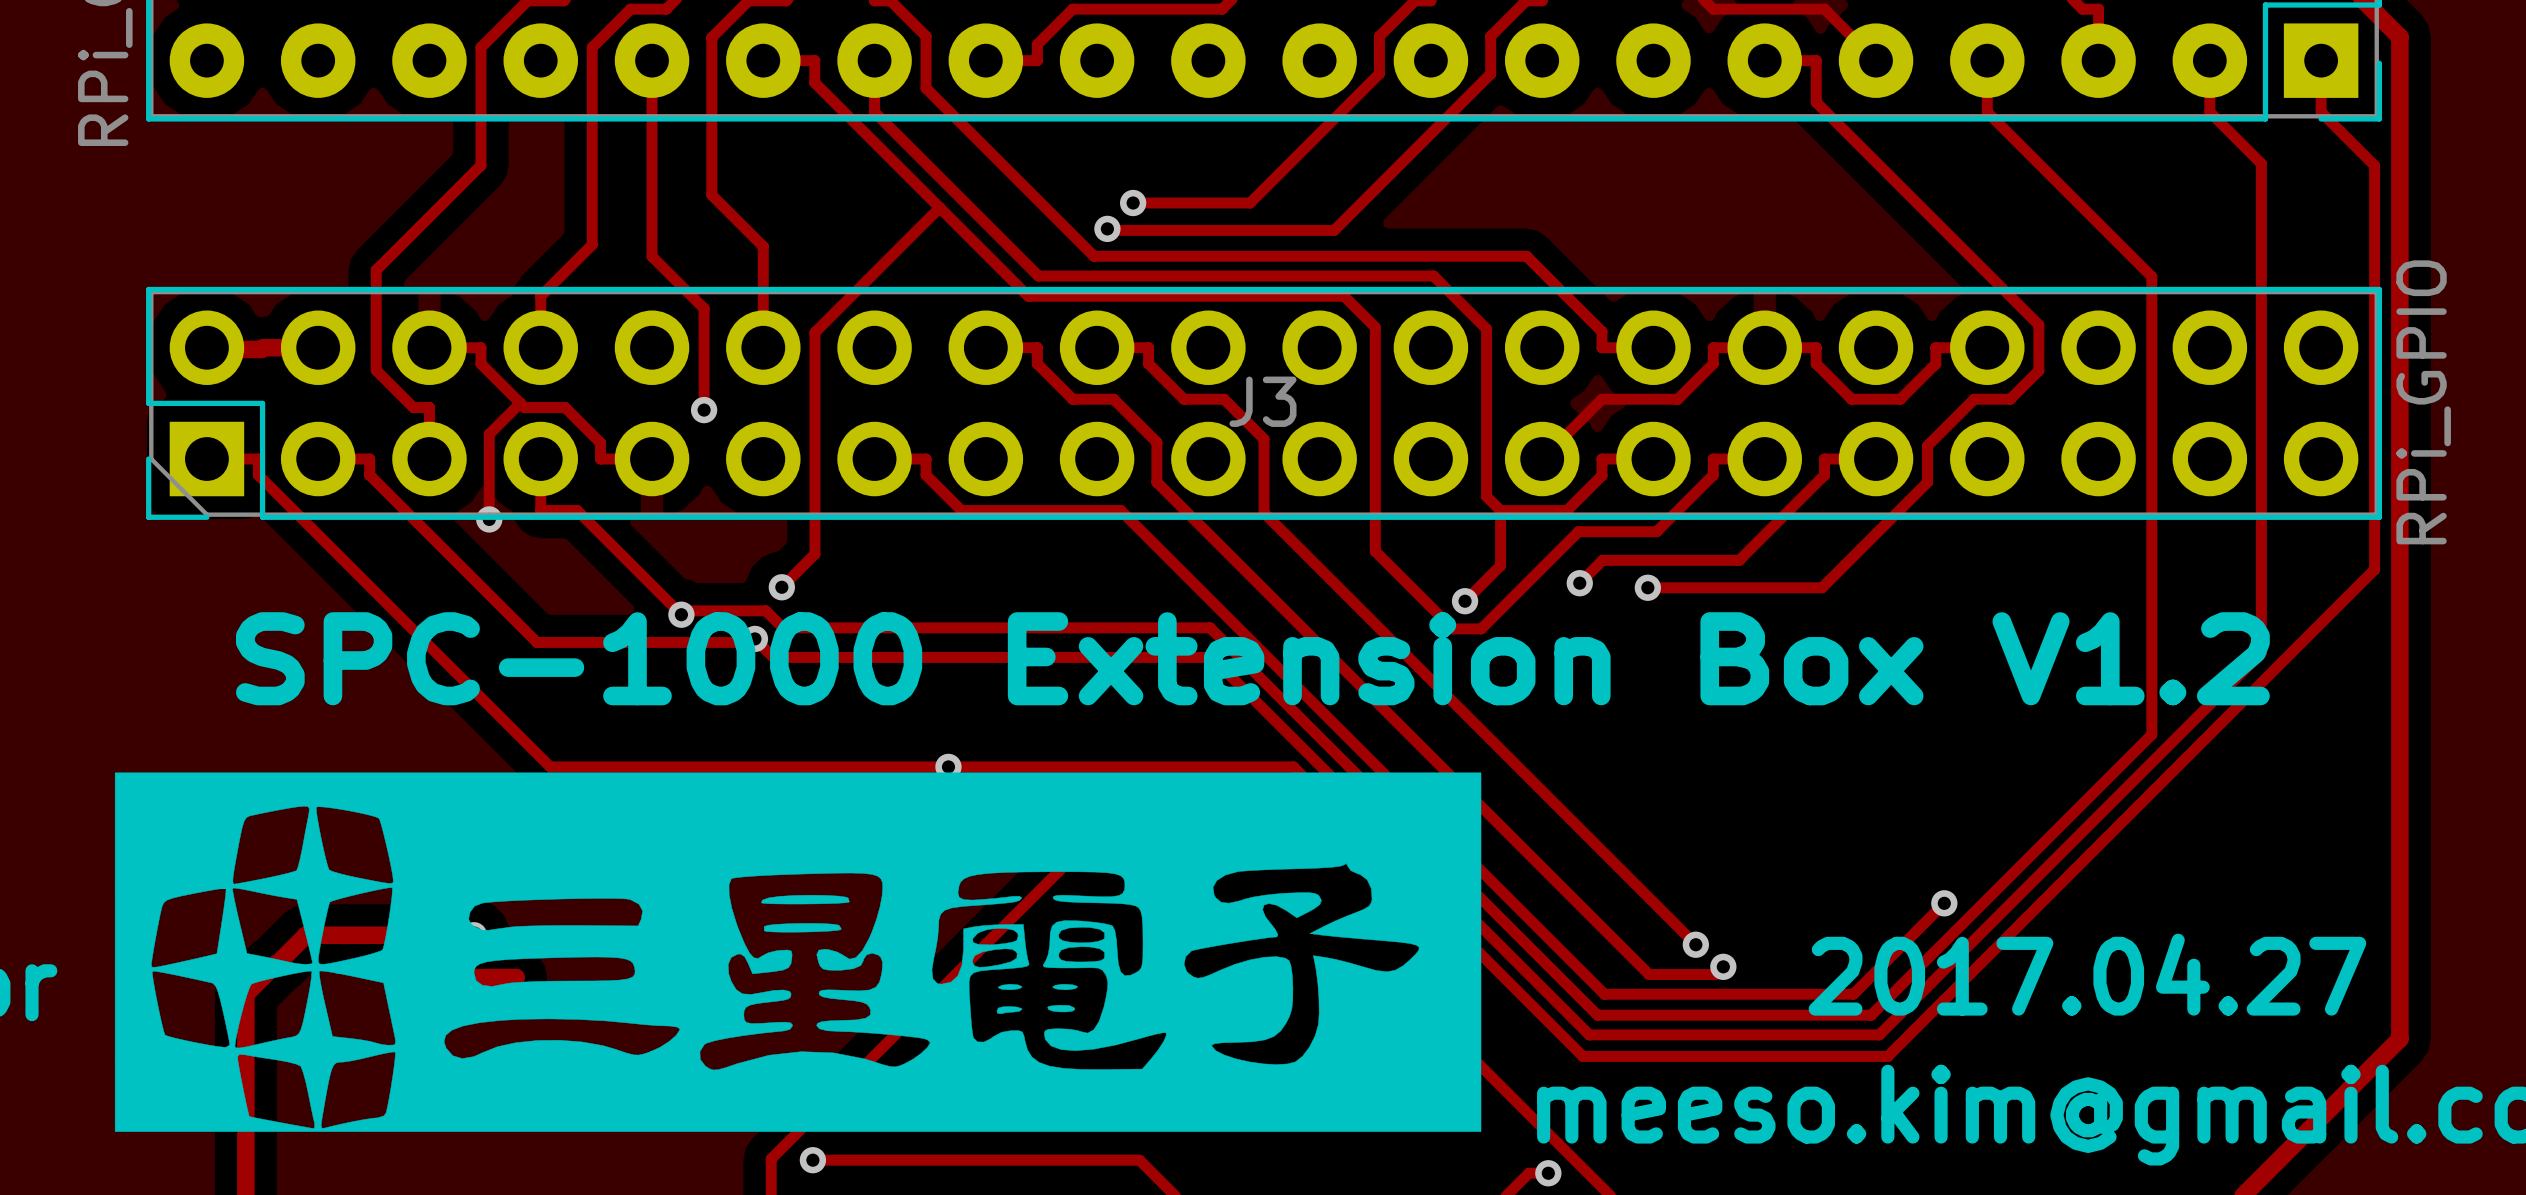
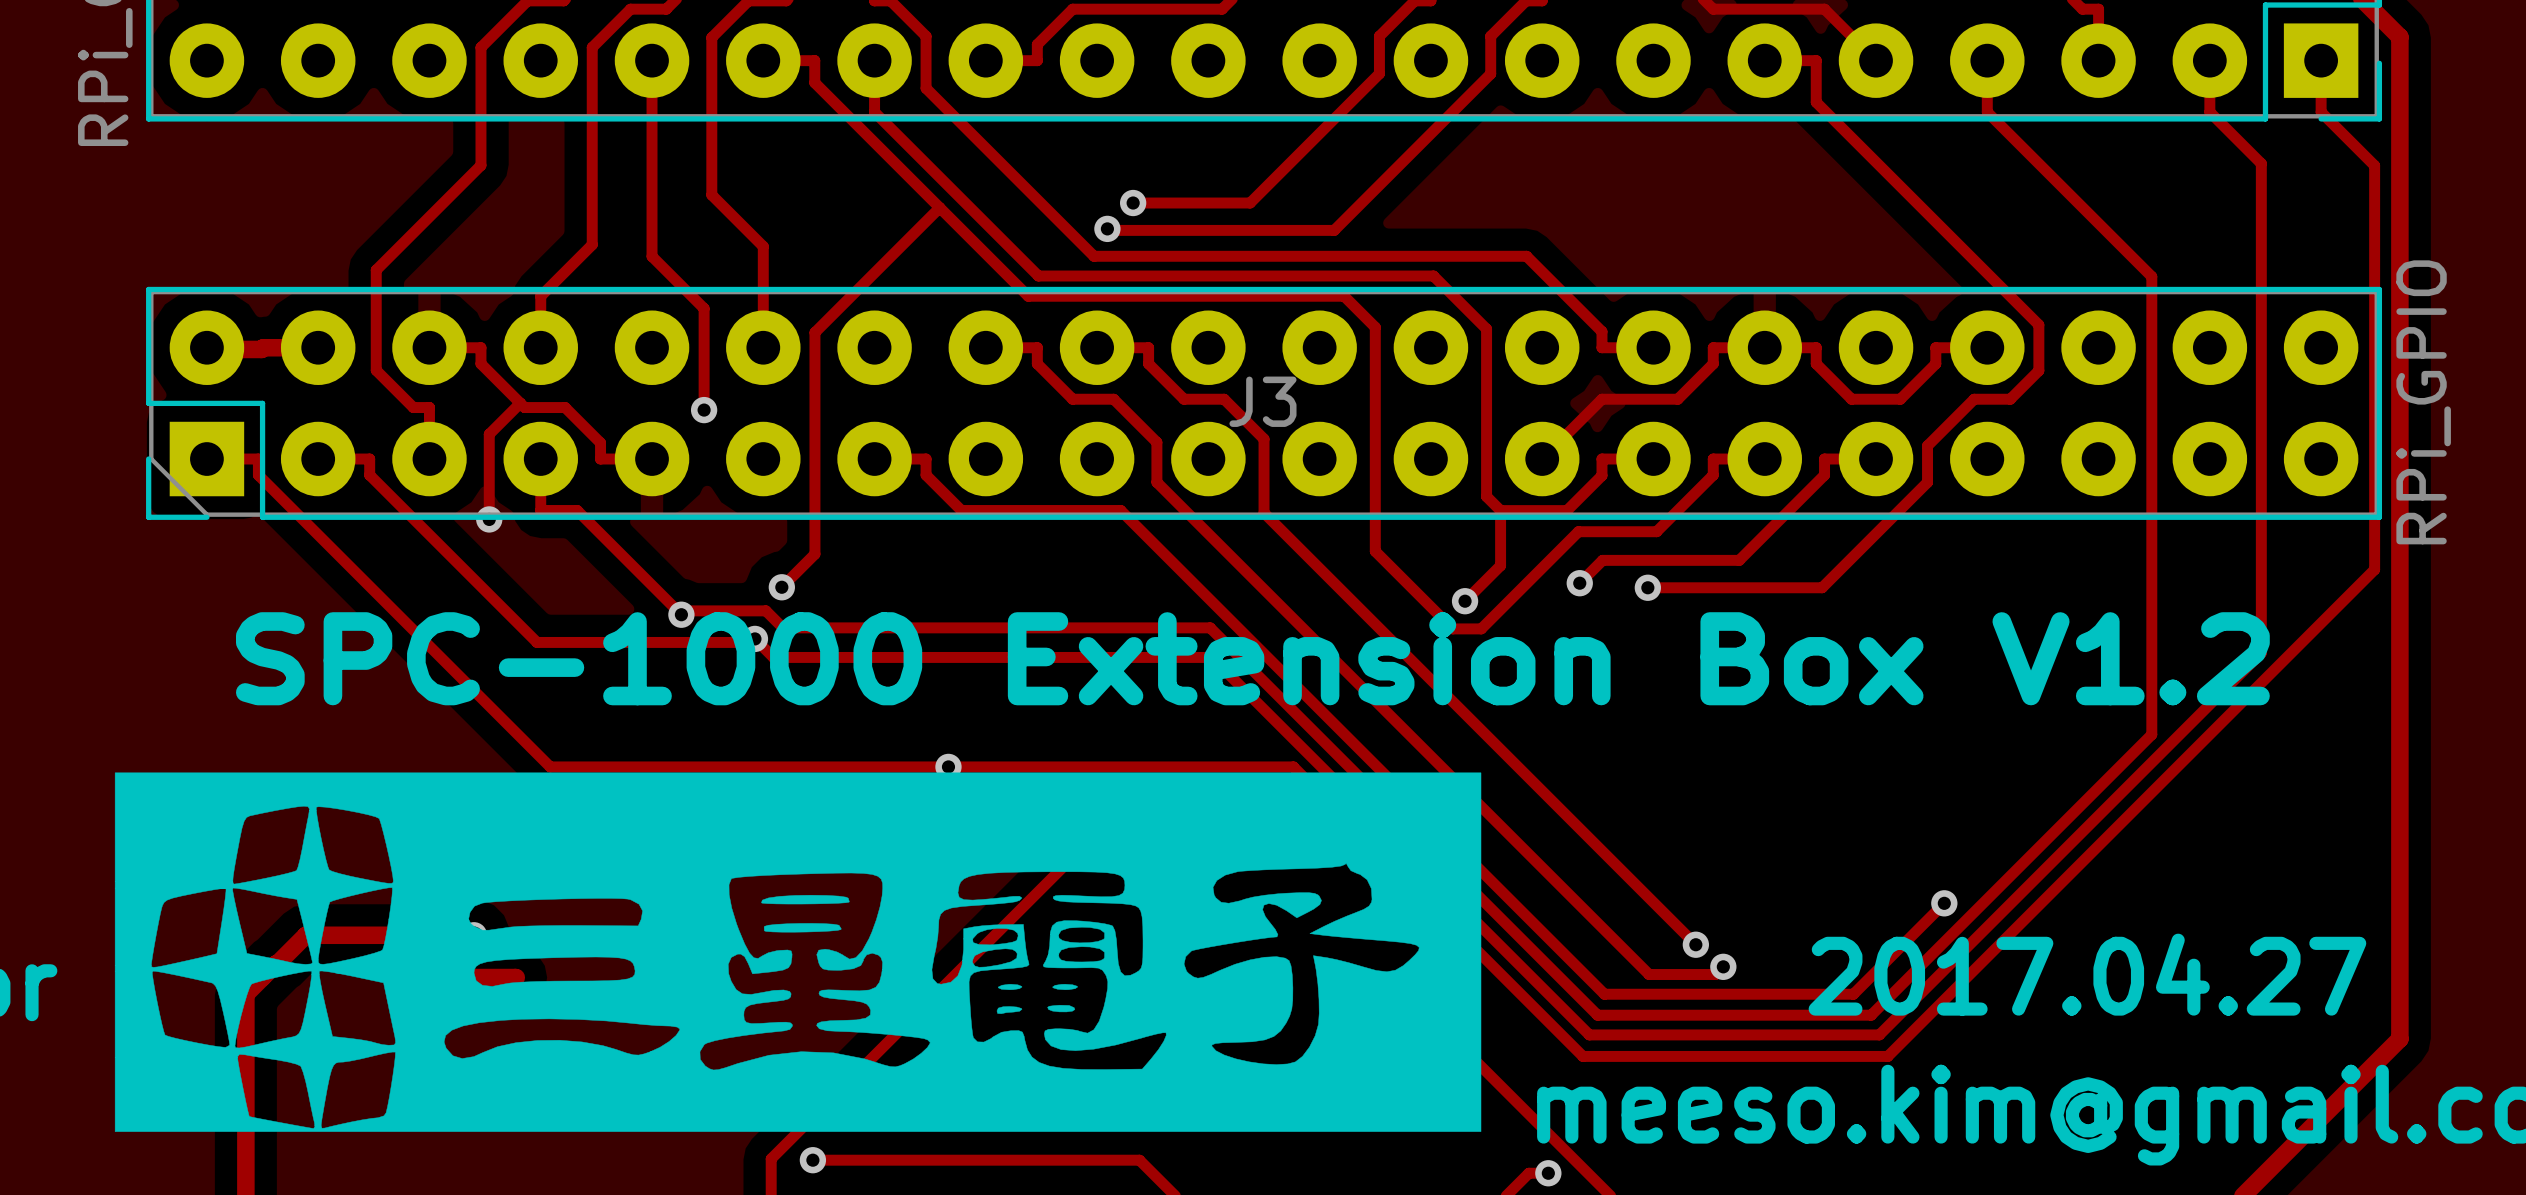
J3 footprint: [146, 286, 2383, 520] -> [146, 286, 2383, 520]

